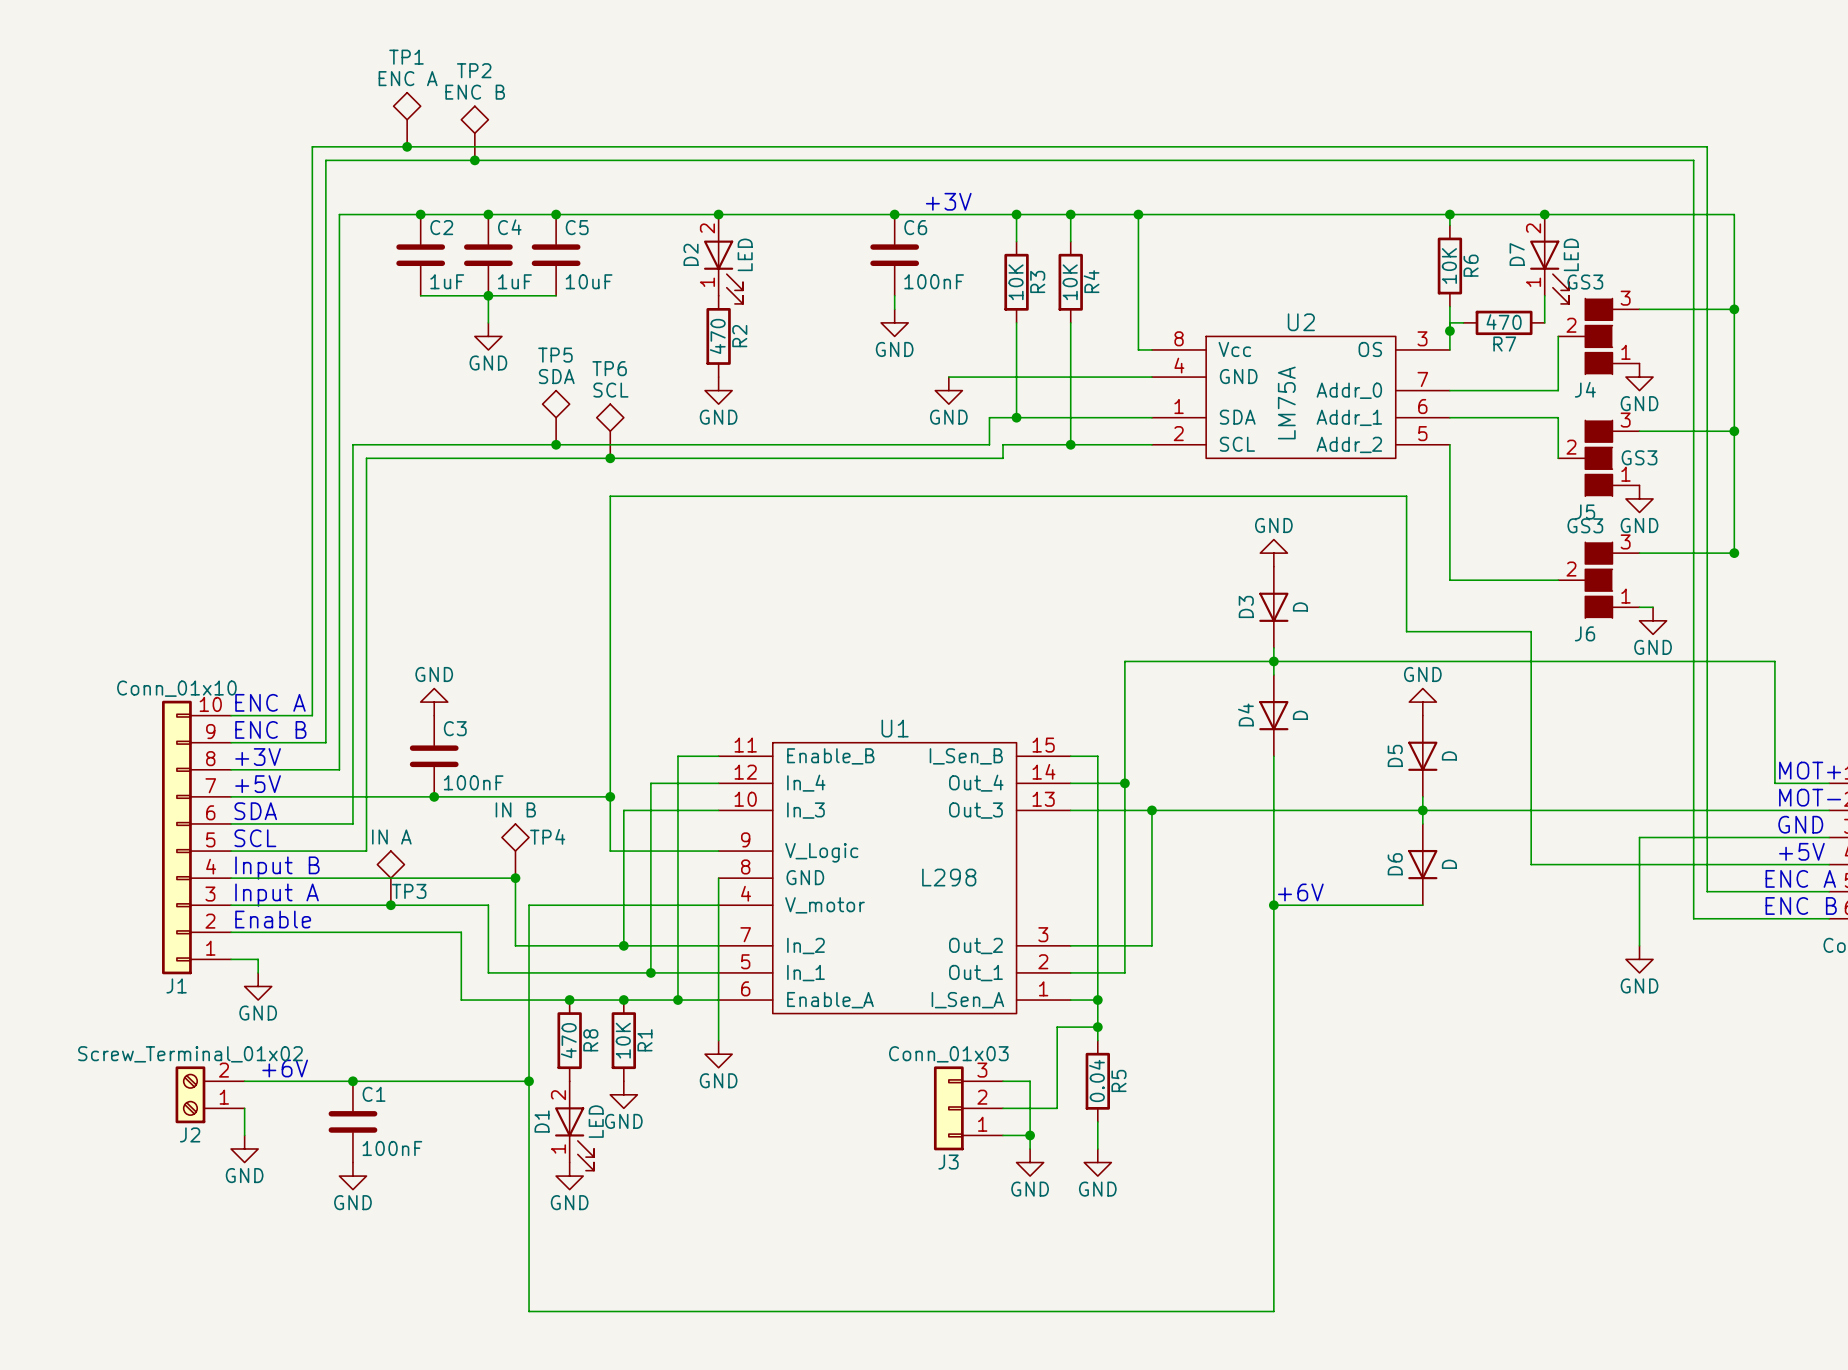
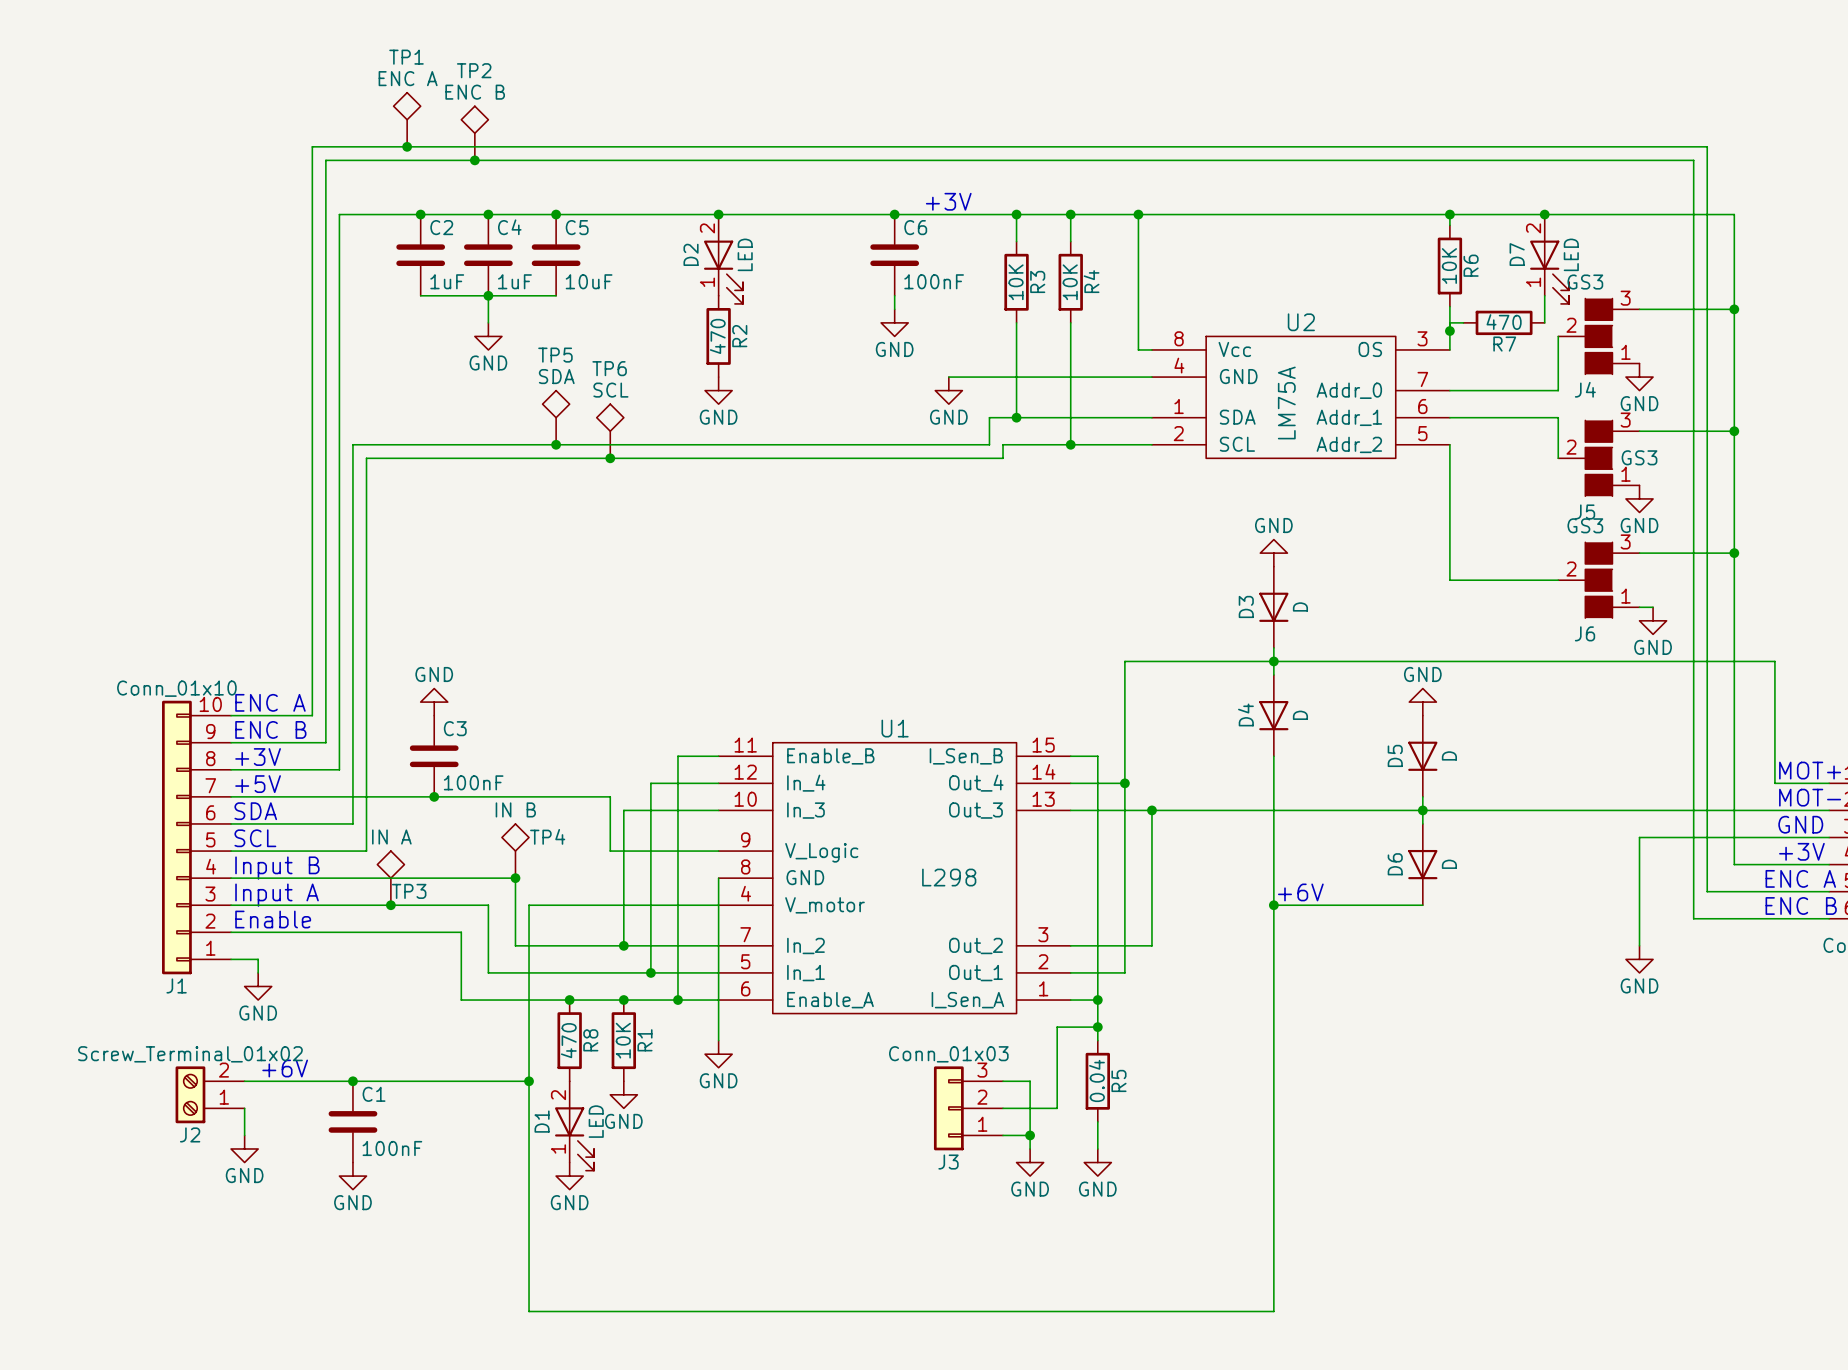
wire: (610, 796) (610, 496) (1406, 496) (1406, 631) (1531, 631) (1531, 864) (1734, 864) -> (1734, 553) (1734, 864)
junction: (610, 796) -> none
text: +5V (1801, 851) -> +3V (1801, 851)

